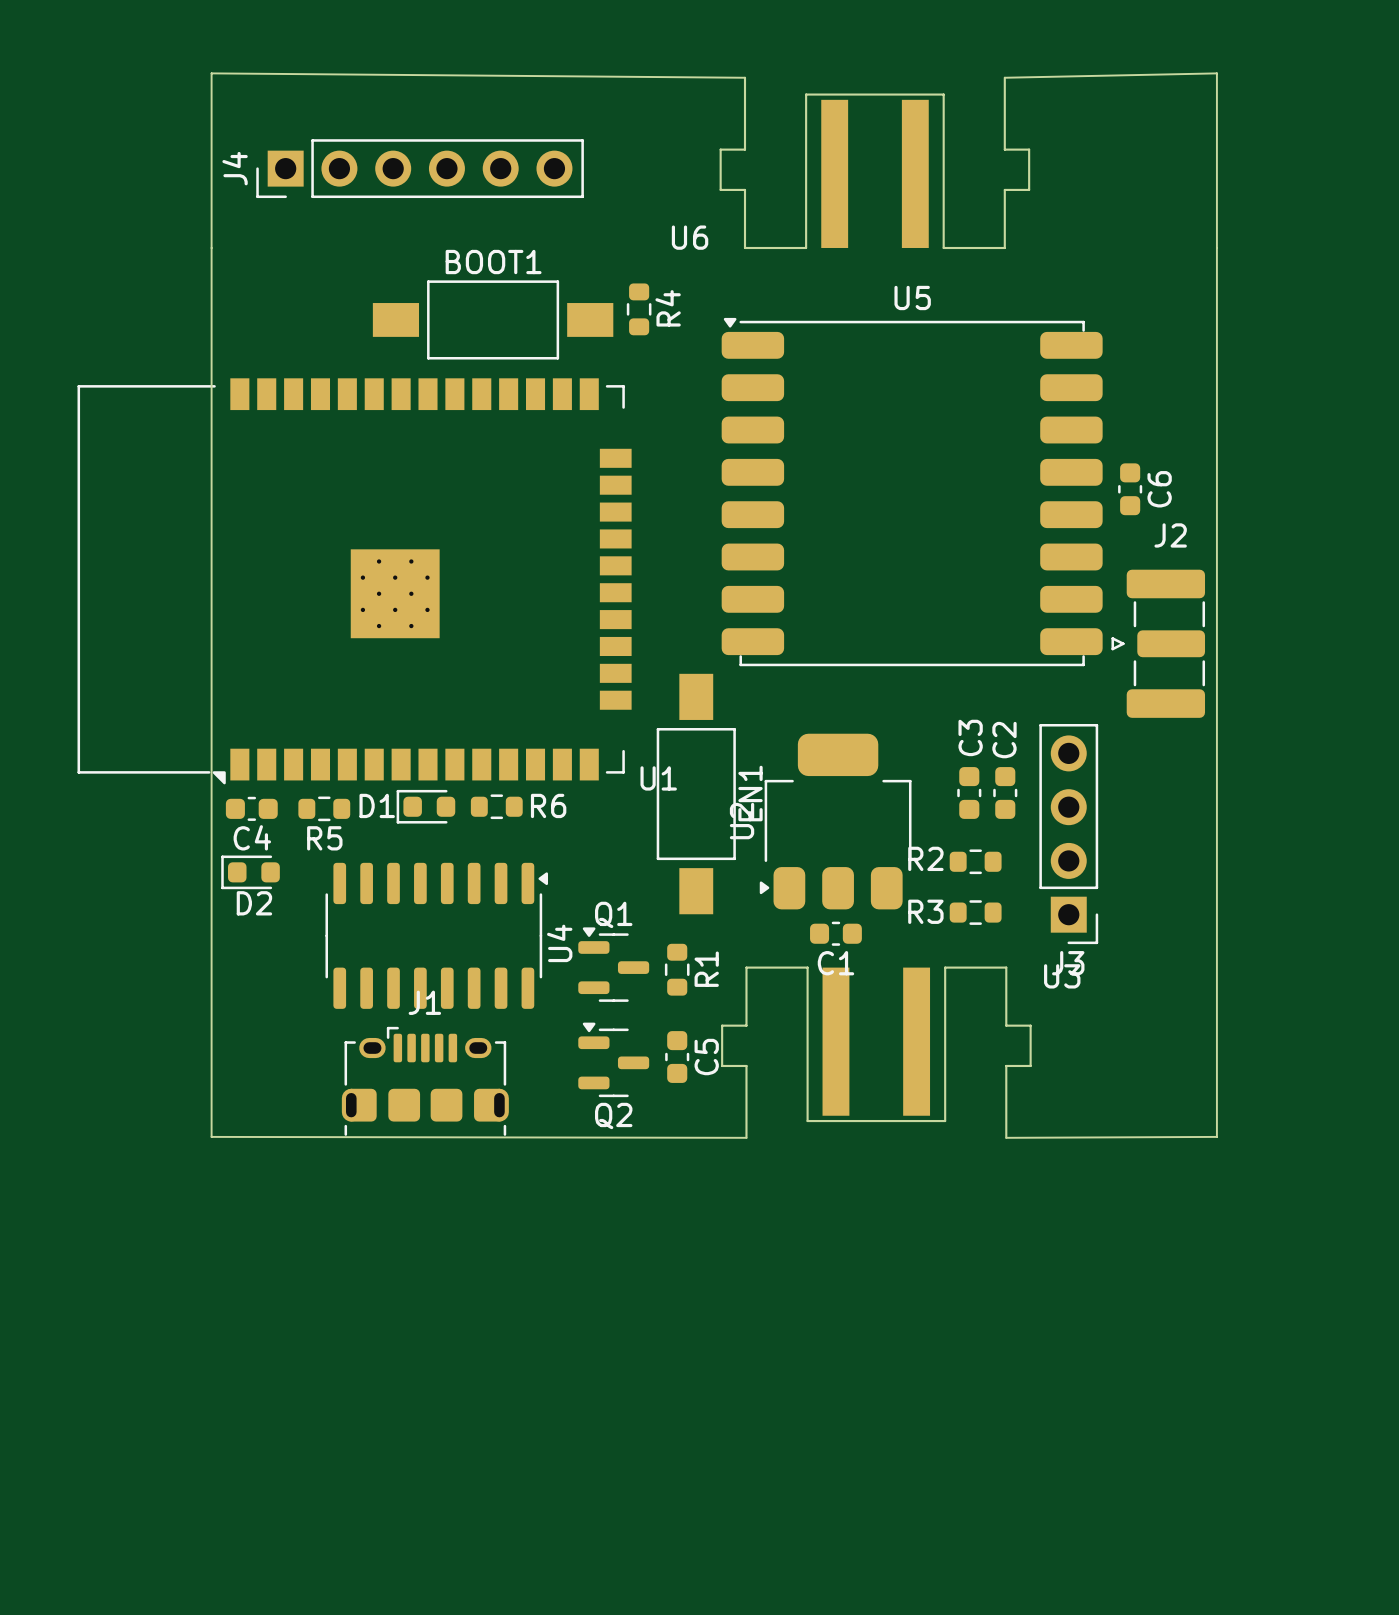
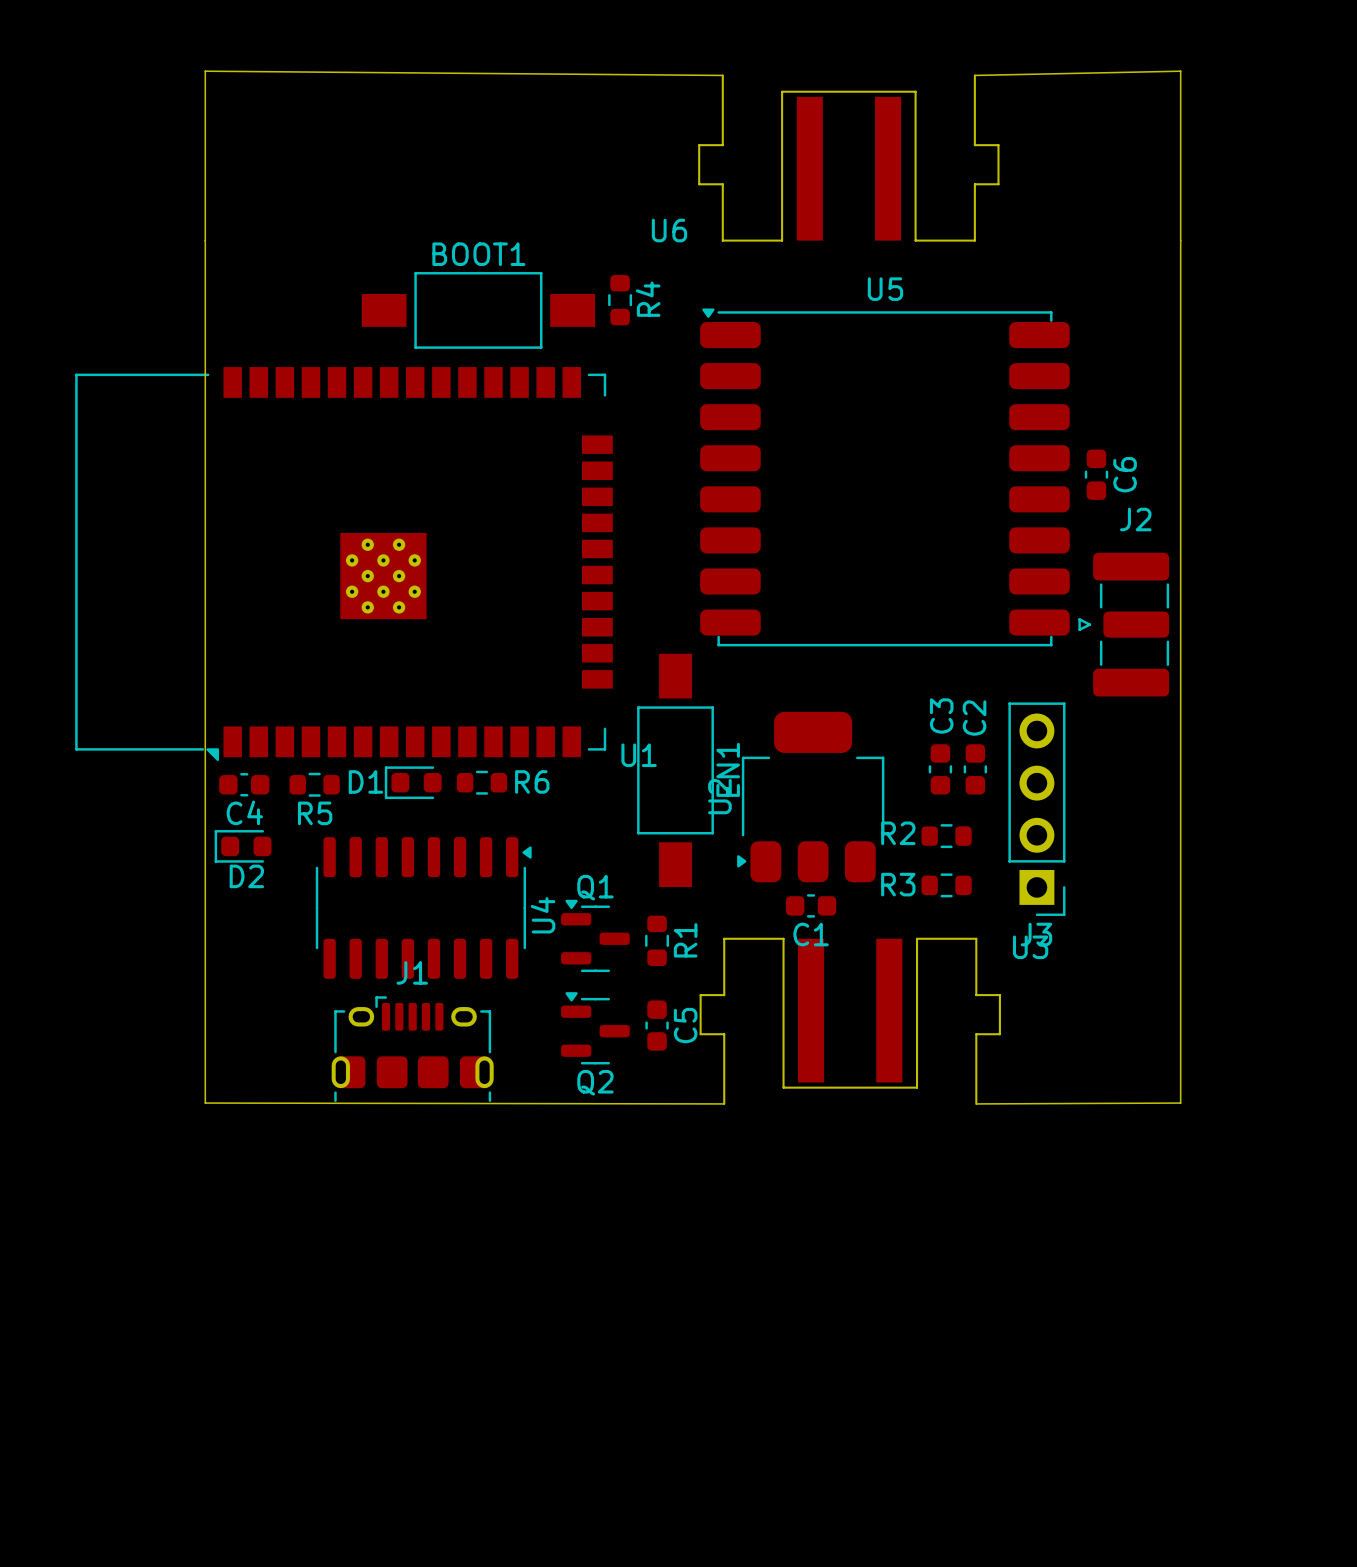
J4: (420, 168) -> none

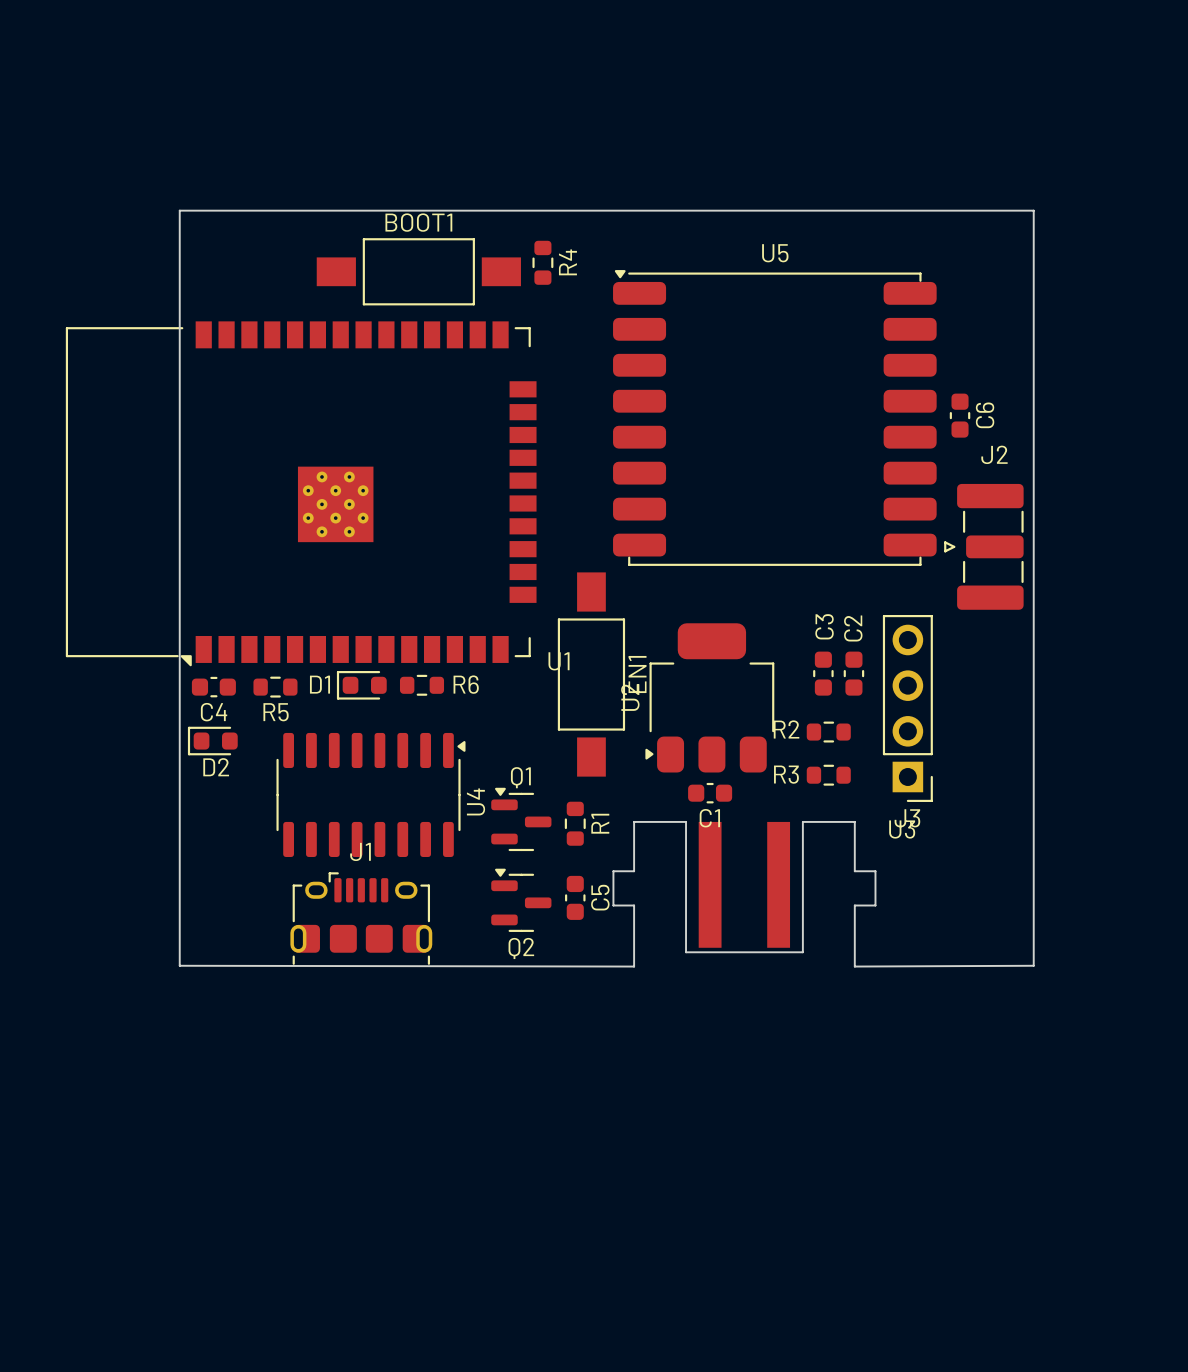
board edge: (722, 75) (205, 71) (205, 240) -> (1033, 210) (179, 210)
board edge: (974, 75) (1180, 71) (1180, 240) -> none
U6: (848, 158) -> none

